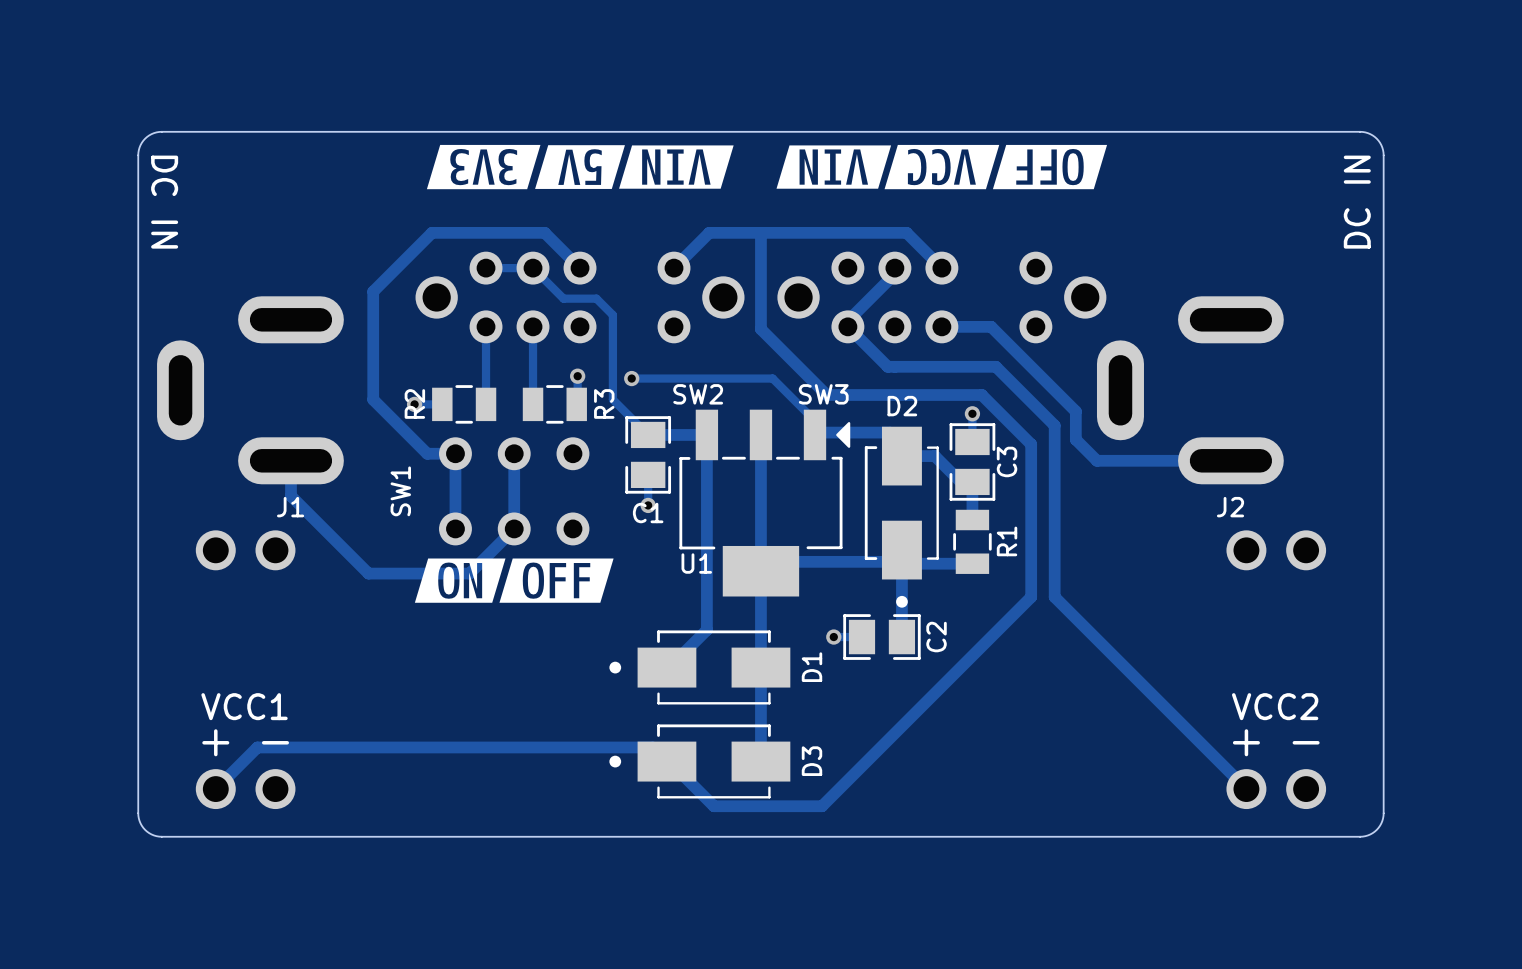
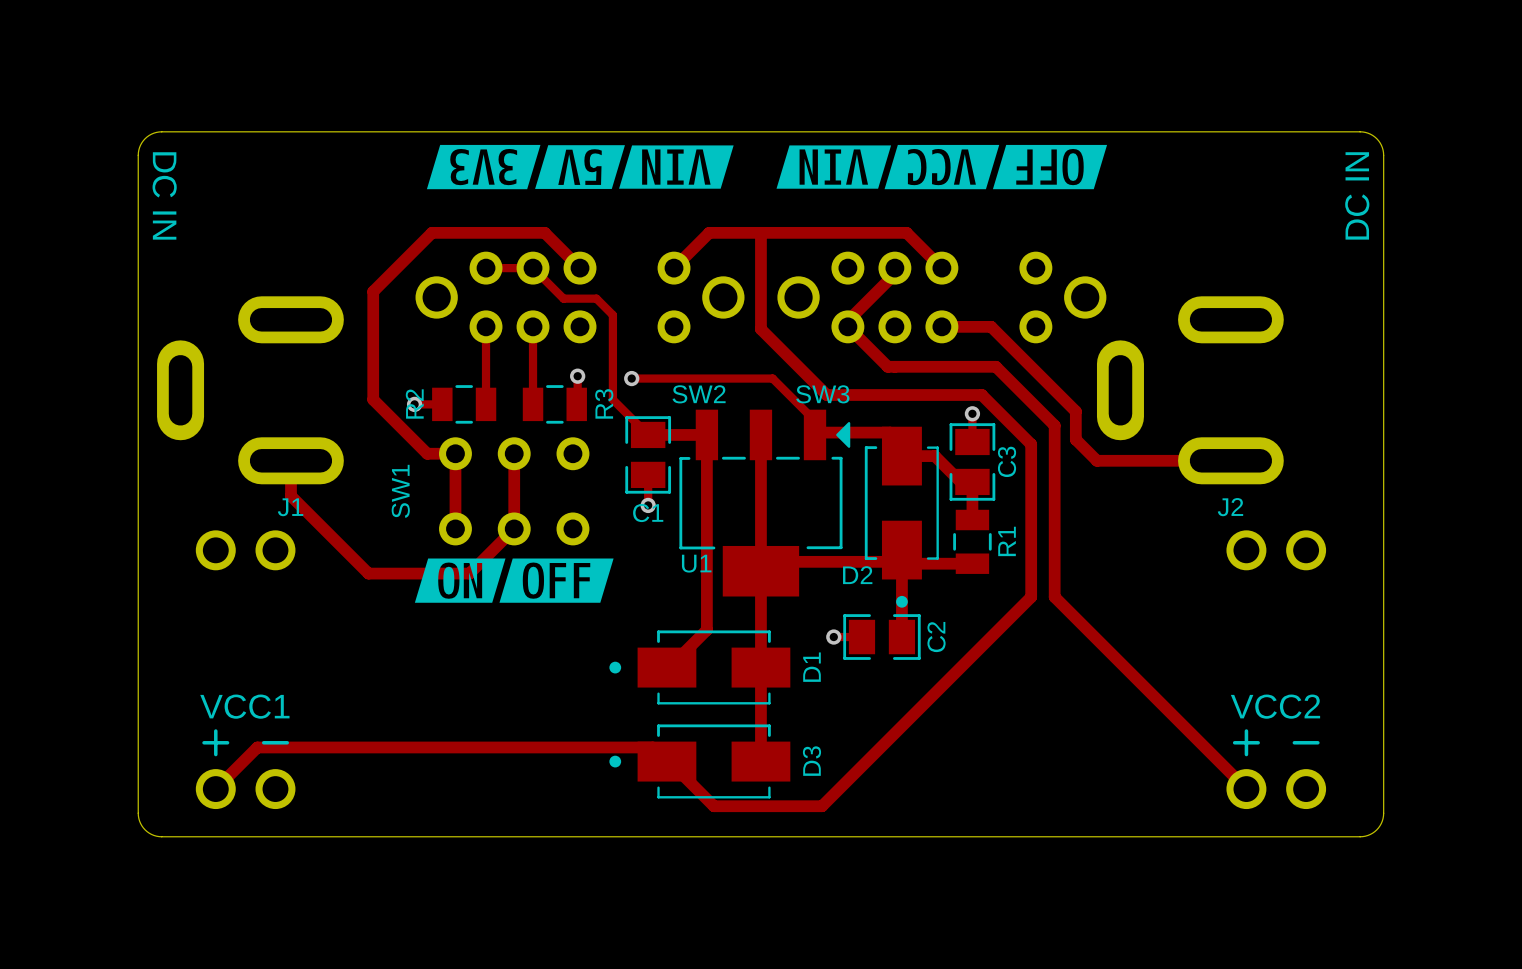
D2 name position: D2 (902, 406) -> D2 (857, 575)

